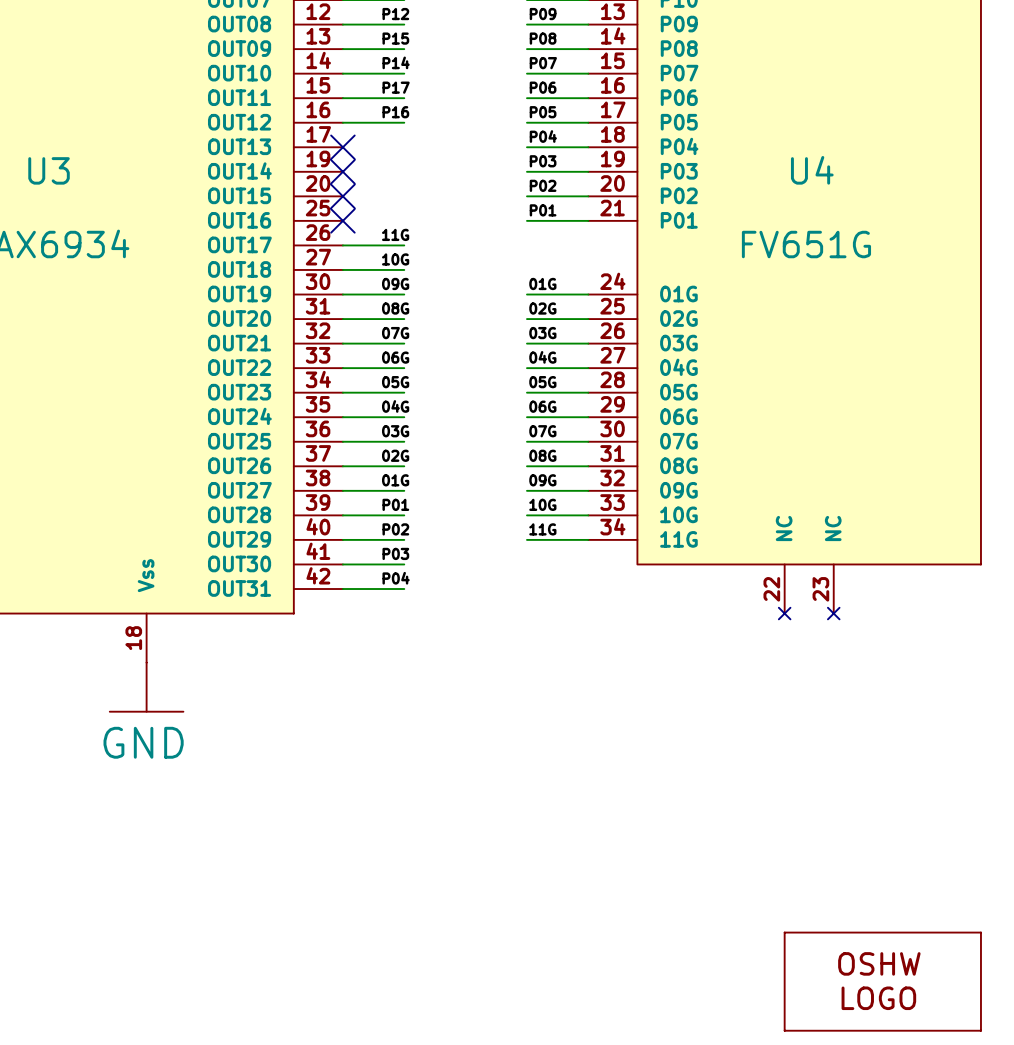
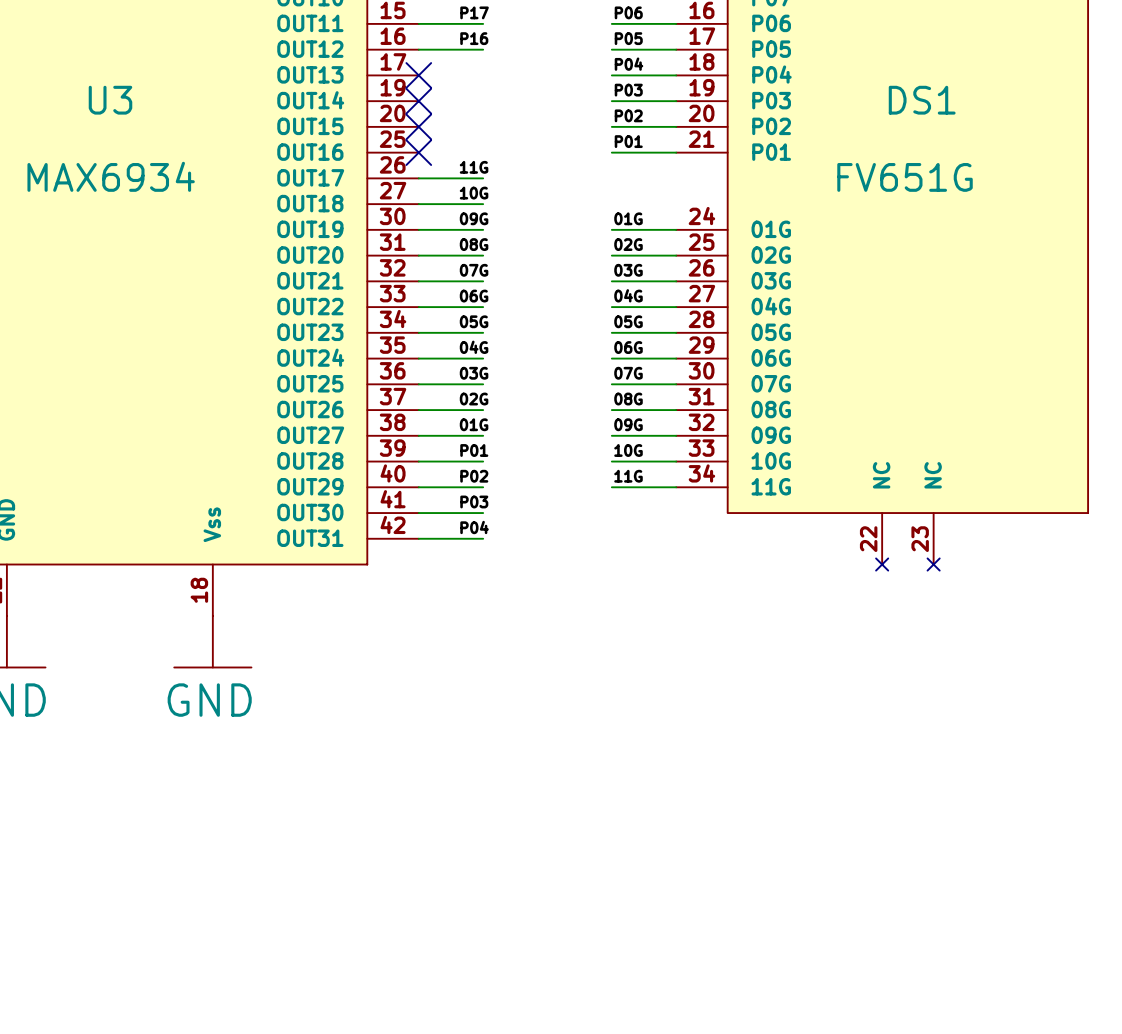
U4 name: U4 (812, 170) -> DS1 (922, 100)
part: (882, 981) -> none

